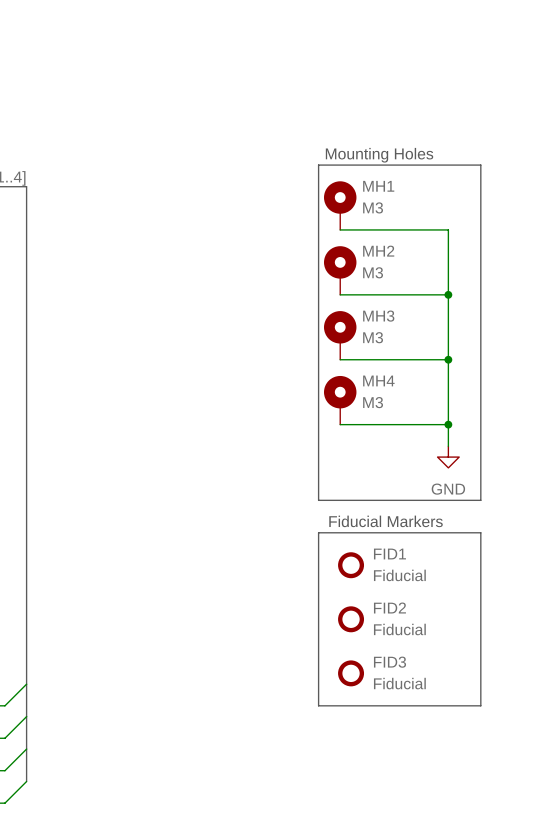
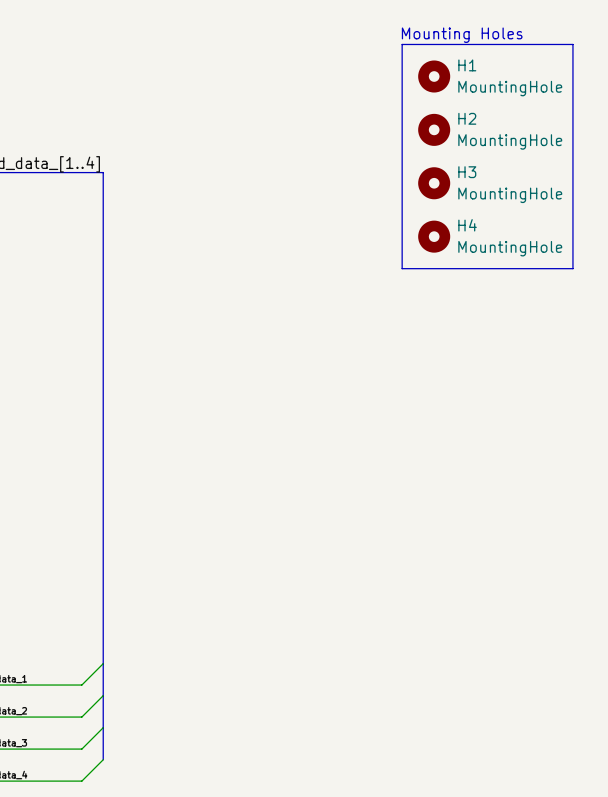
line: none -> (402, 44) (572, 44) (572, 268) (402, 268) (402, 44)
H1: none -> MountingHole (434, 76)
H2: none -> MountingHole (434, 129)
text position: Mounting Holes (379, 155) -> Mounting Holes (462, 35)
line: (318, 165) (318, 500) (480, 500) (480, 165) (318, 165) -> none
H3: none -> MountingHole (434, 183)
MH1: M3 (340, 205) -> none
wire: (340, 229) (448, 229) (448, 446) -> none
H4: none -> MountingHole (434, 236)
MH2: M3 (340, 270) -> none
wire: (340, 294) (448, 294) -> none
junction: (448, 294) -> none
MH3: M3 (340, 335) -> none
wire: (340, 359) (448, 359) -> none
junction: (448, 359) -> none
MH4: M3 (340, 400) -> none
wire: (340, 424) (448, 424) -> none
junction: (448, 424) -> none
power symbol: GND (448, 457) -> none
text: Fiducial Markers (386, 521) -> none
line: (318, 532) (480, 532) (480, 705) (318, 705) (318, 532) -> none
FID1: Fiducial (351, 565) -> none
FID2: Fiducial (351, 619) -> none
FID3: Fiducial (351, 673) -> none

